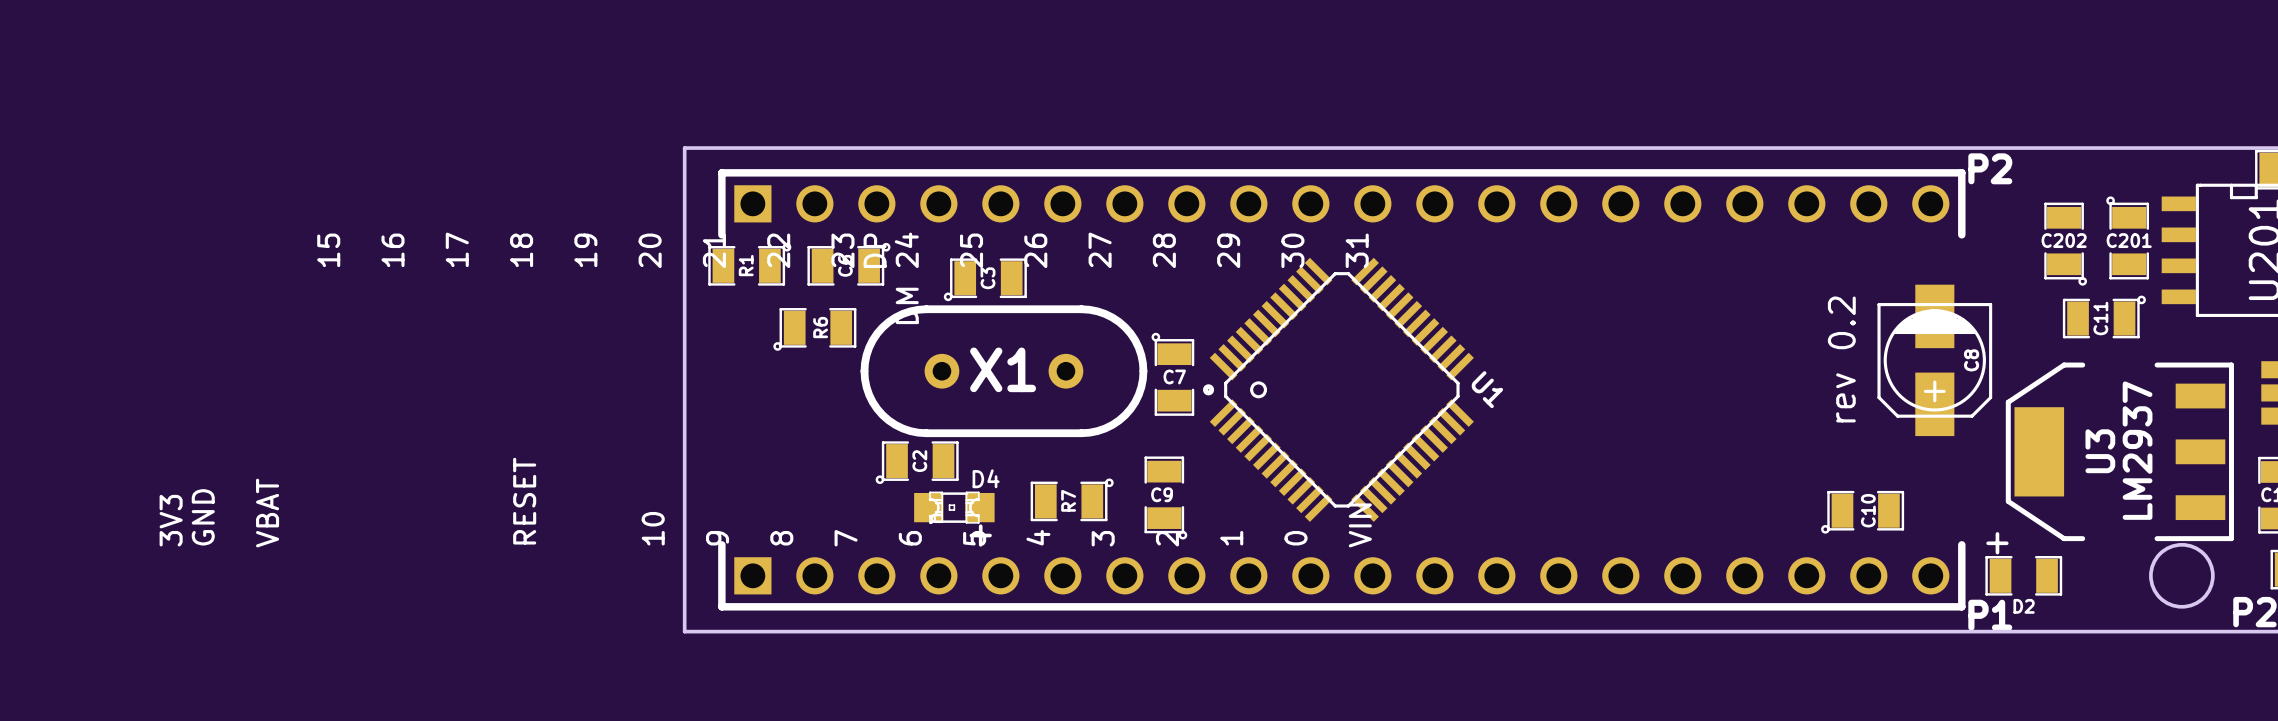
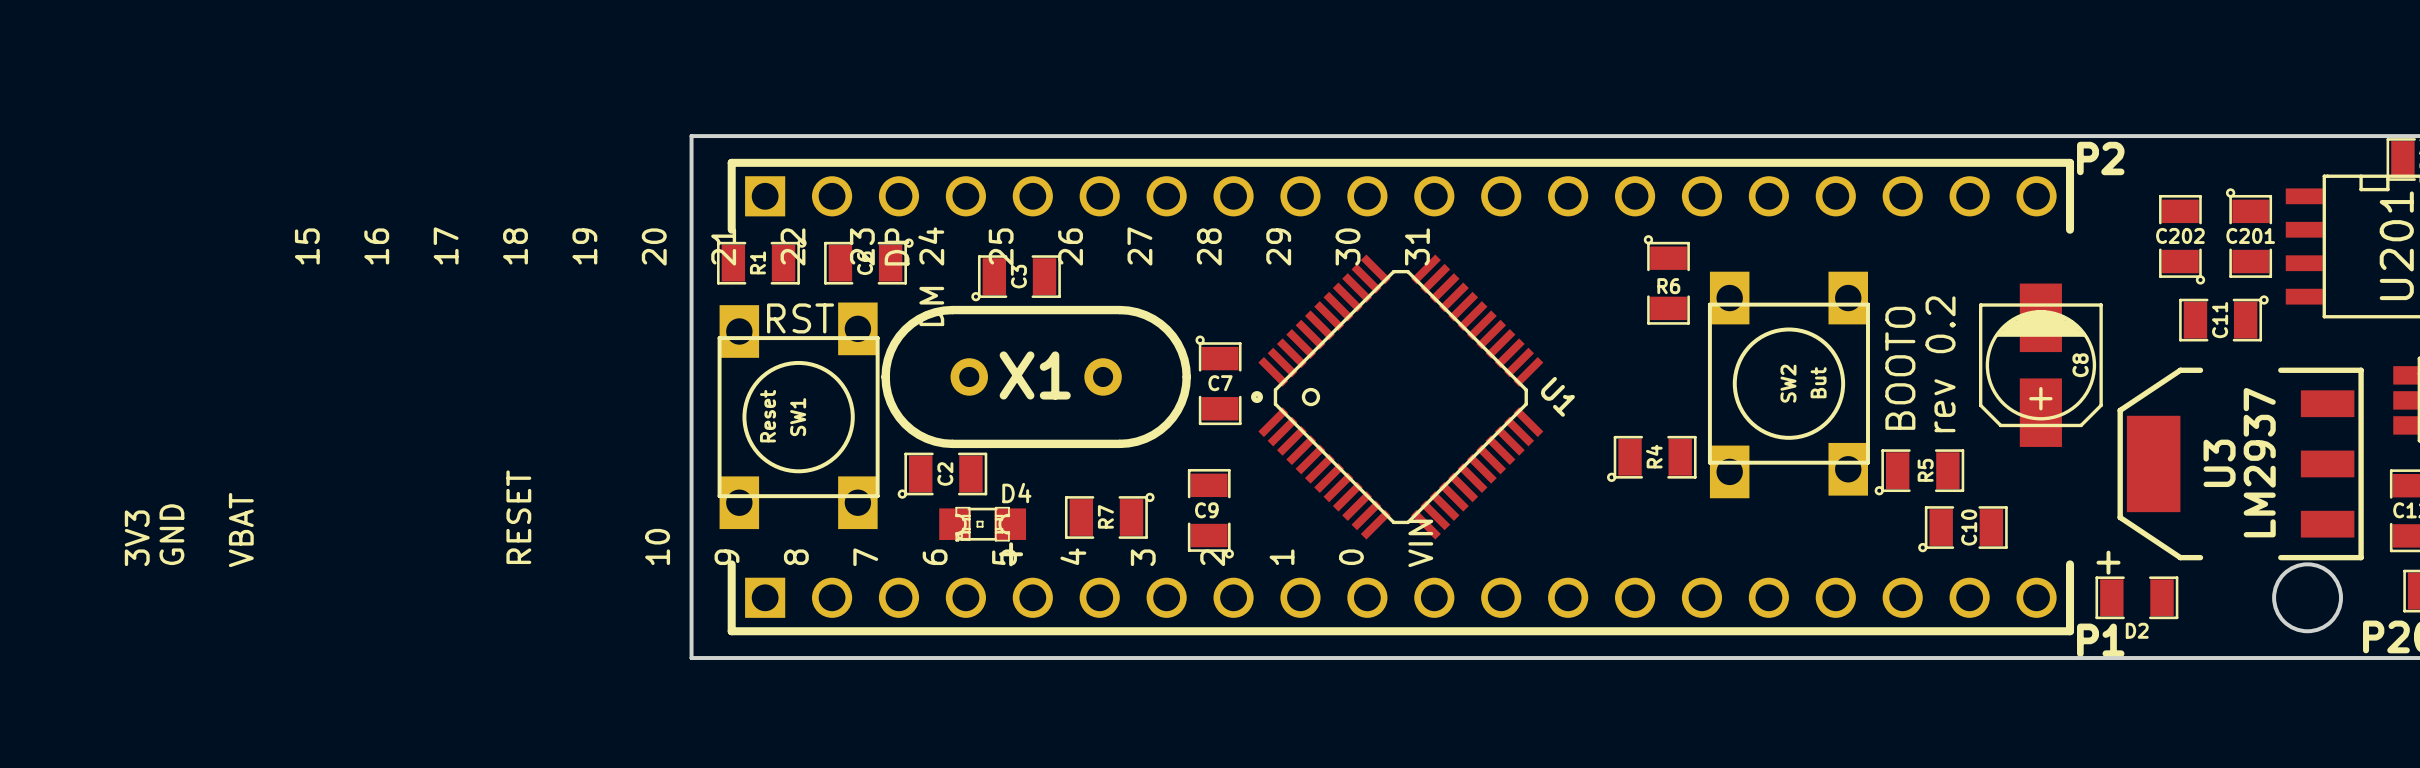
text: none -> RST (800, 318)
R6 rotation: 0° (814, 329) -> 90° clockwise (1666, 279)
R6 position: (814, 329) -> (1666, 279)
text: none -> BOOTO (1900, 368)
SW2: none -> But (1788, 384)
SW1: none -> Reset (798, 415)
R4: none -> (1651, 458)
R5: none -> (1919, 472)

